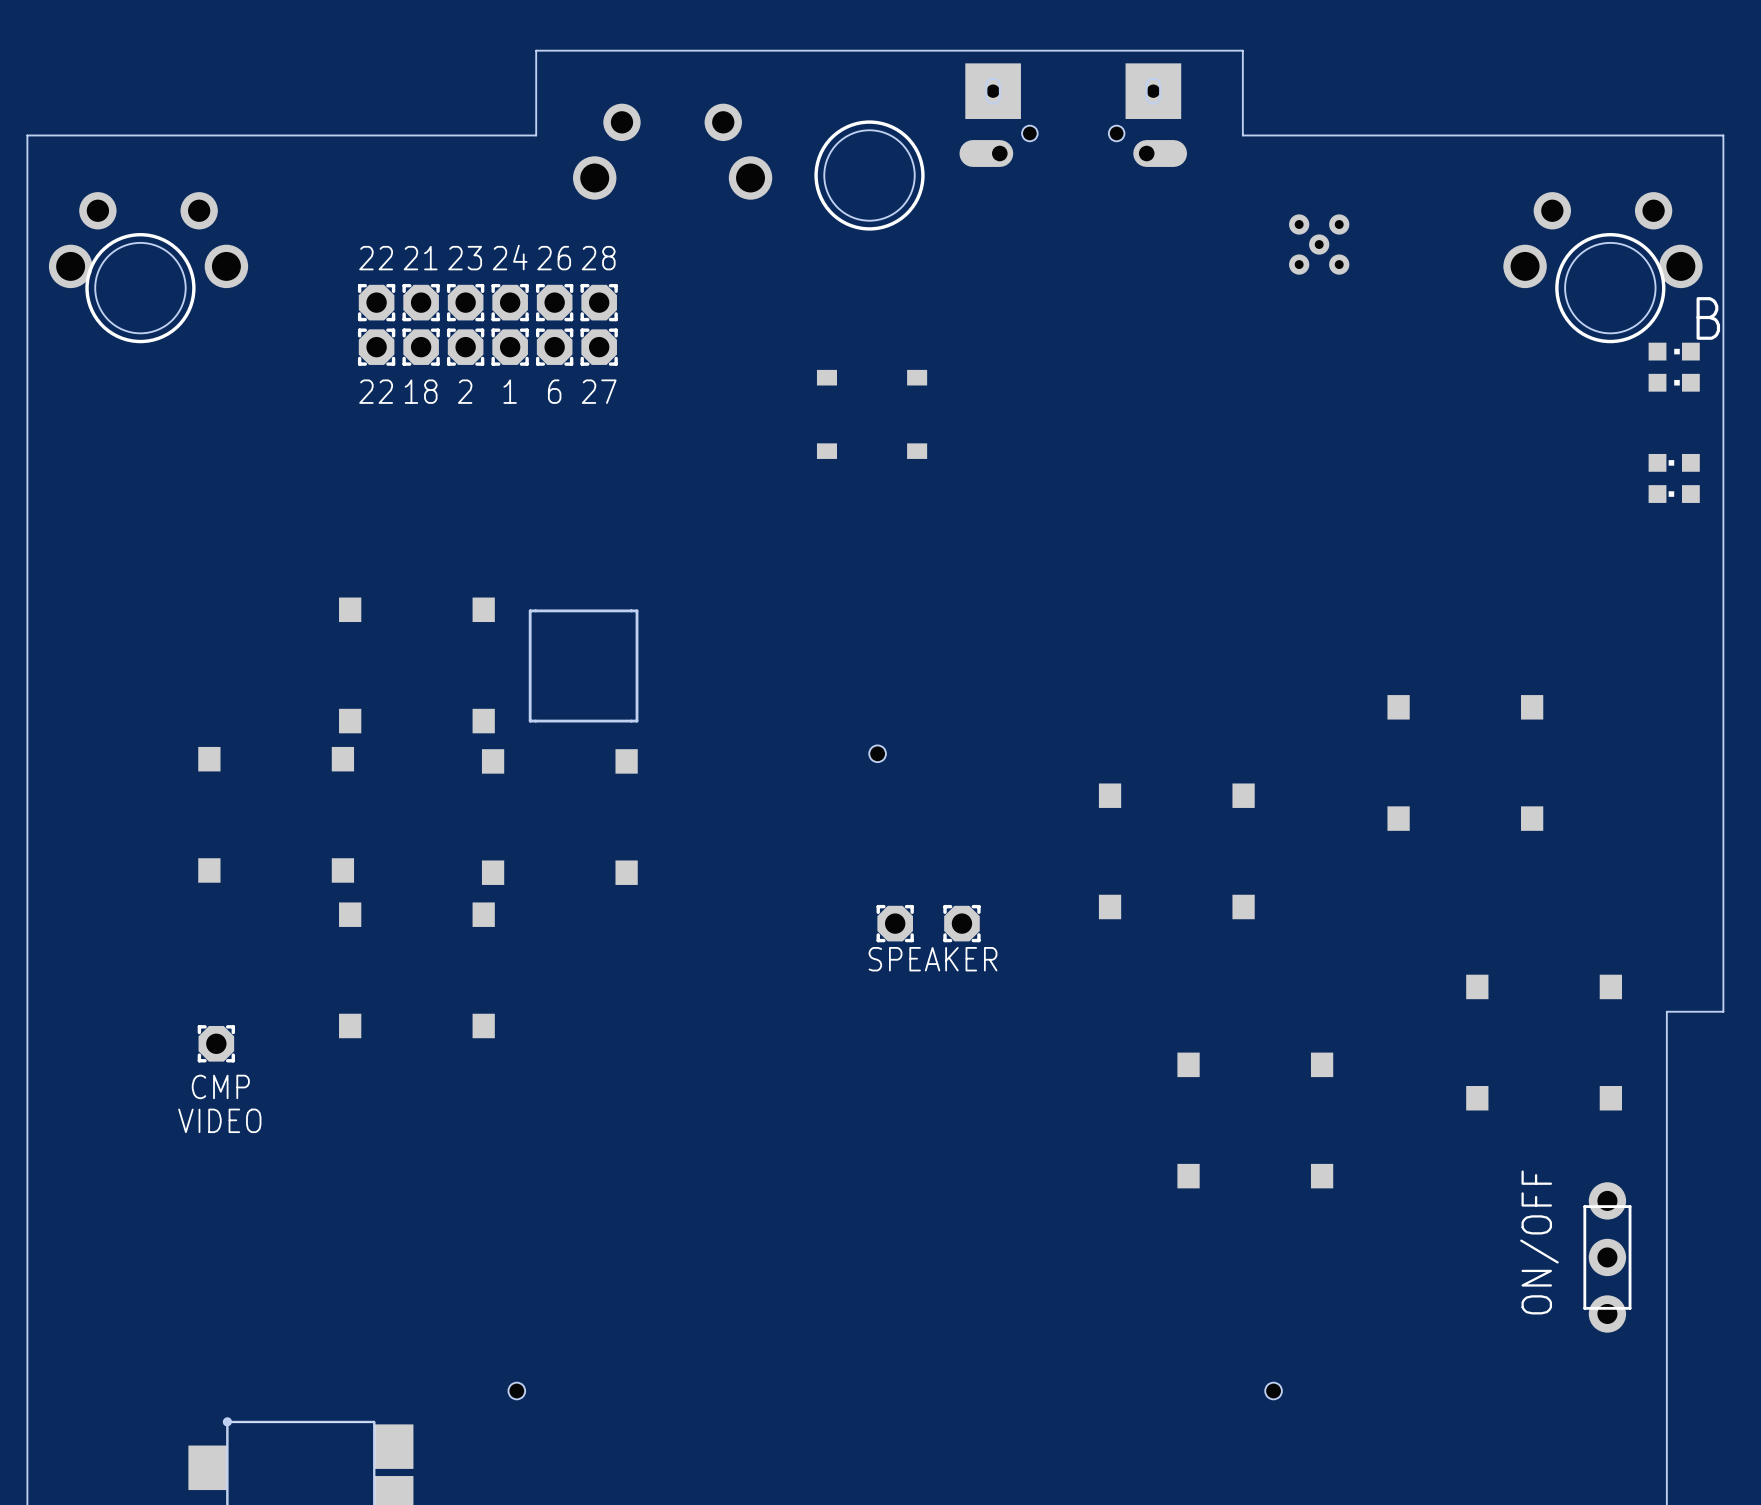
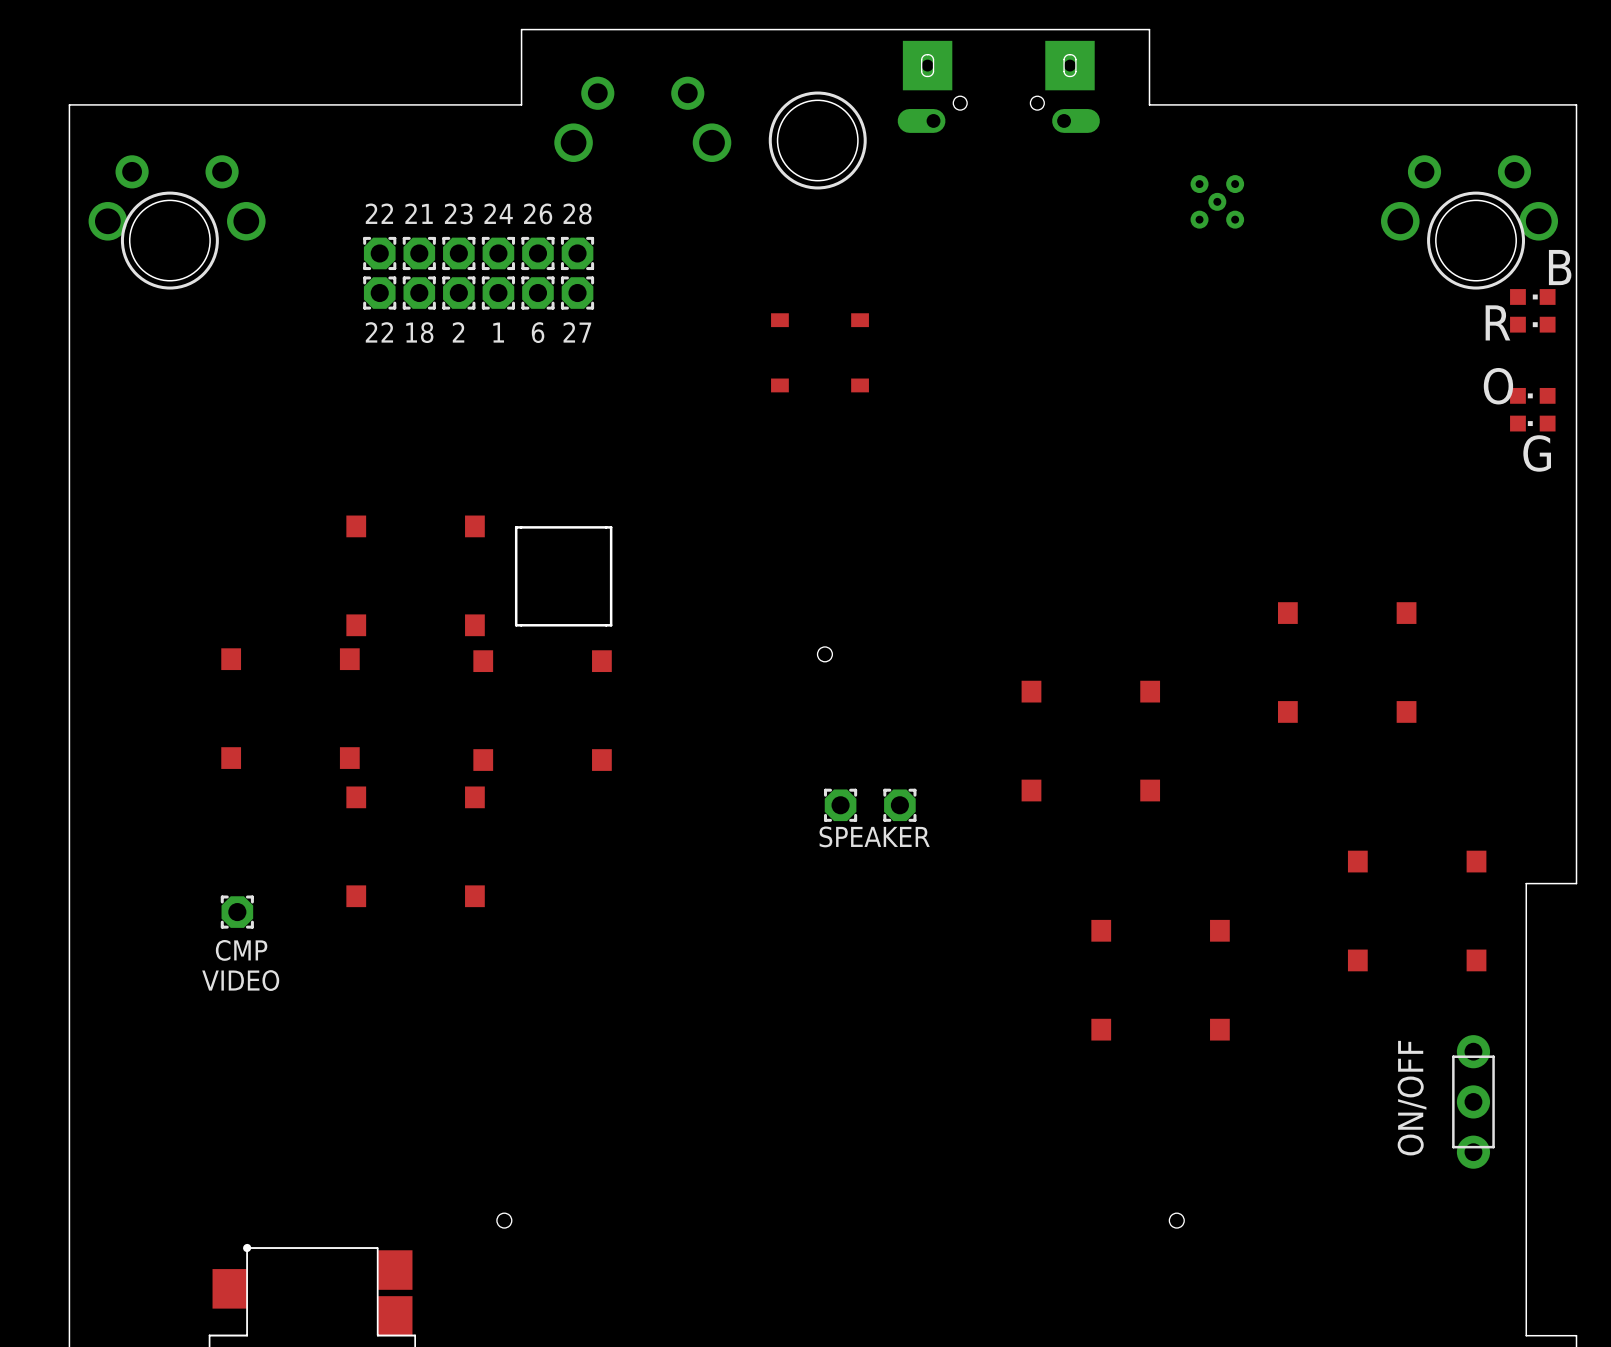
text: none -> R (1497, 322)
text: none -> O (1498, 386)
text: none -> G (1537, 453)

